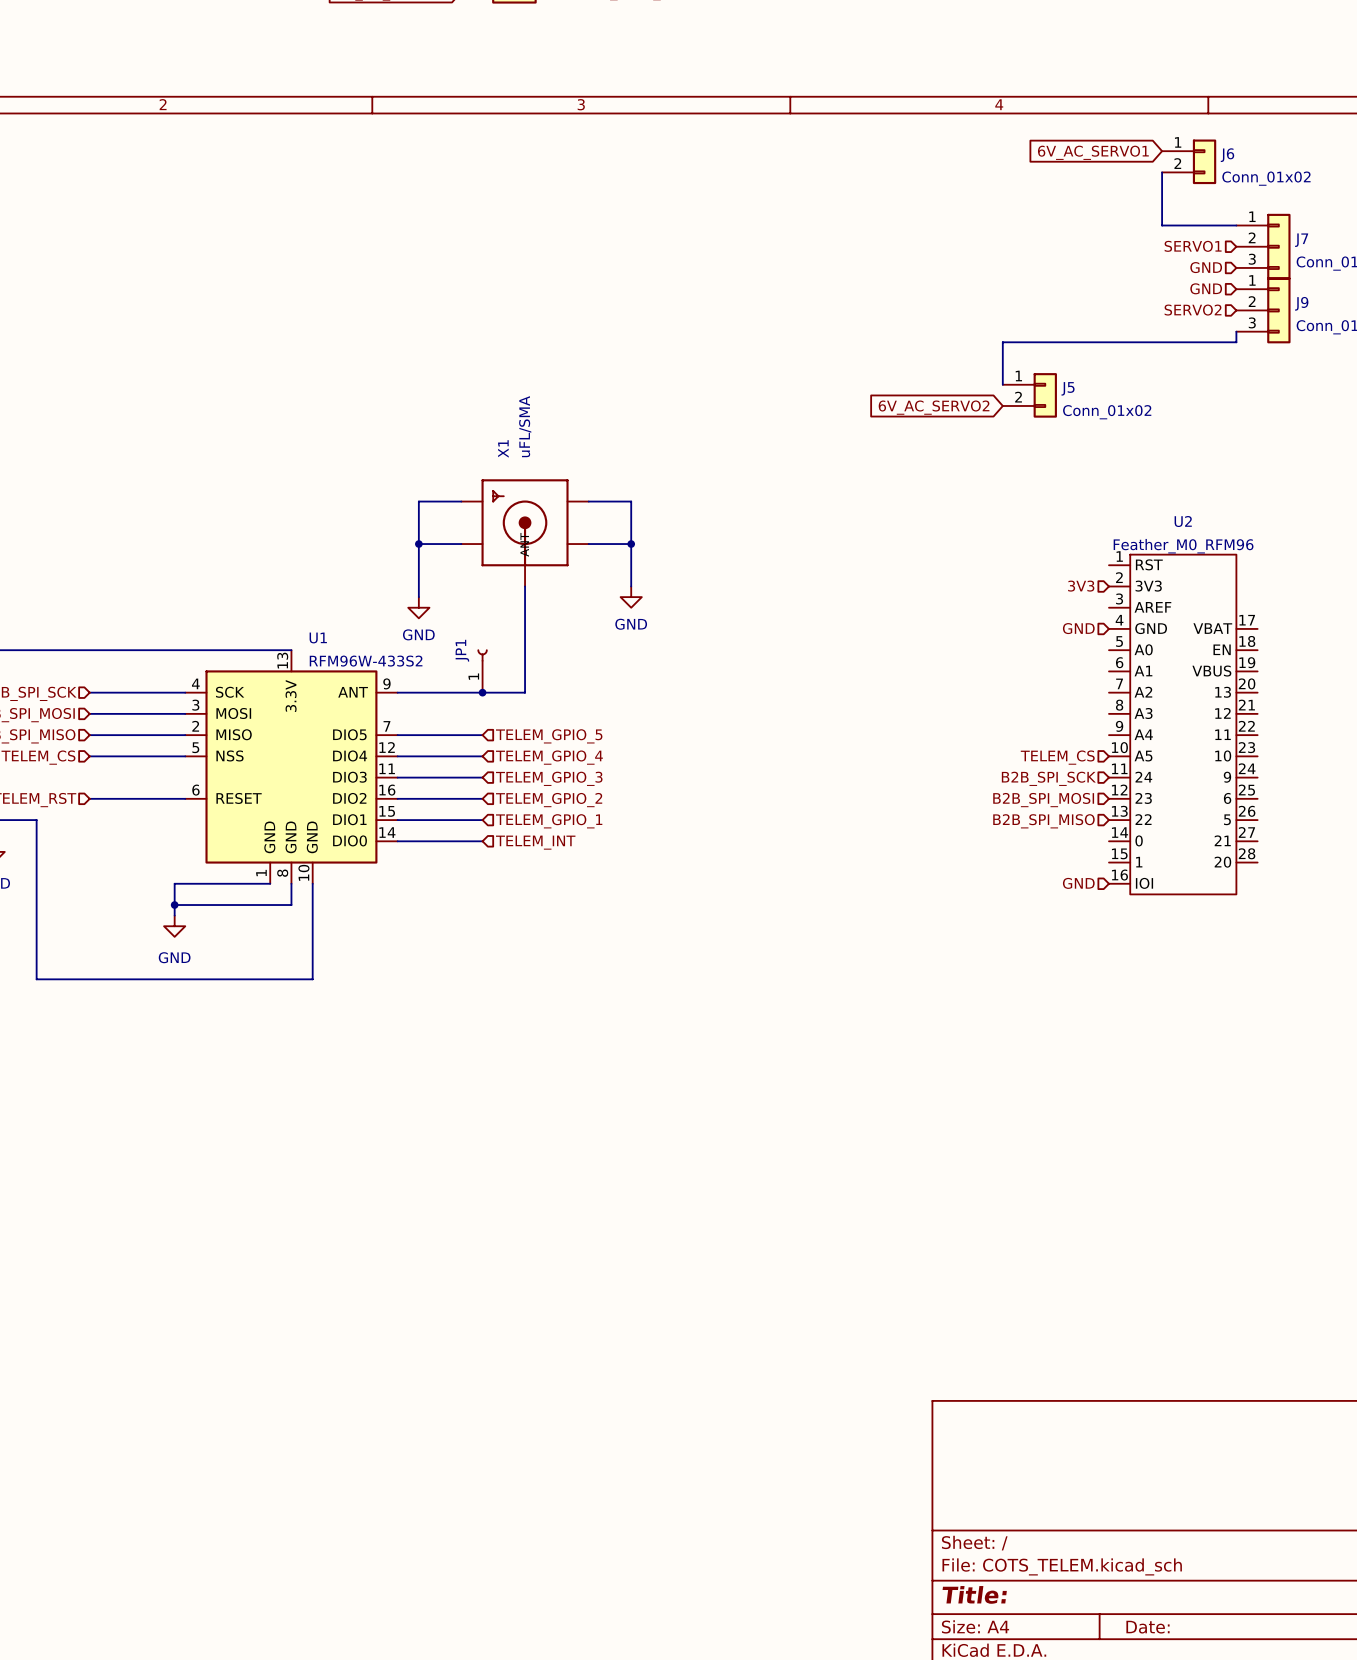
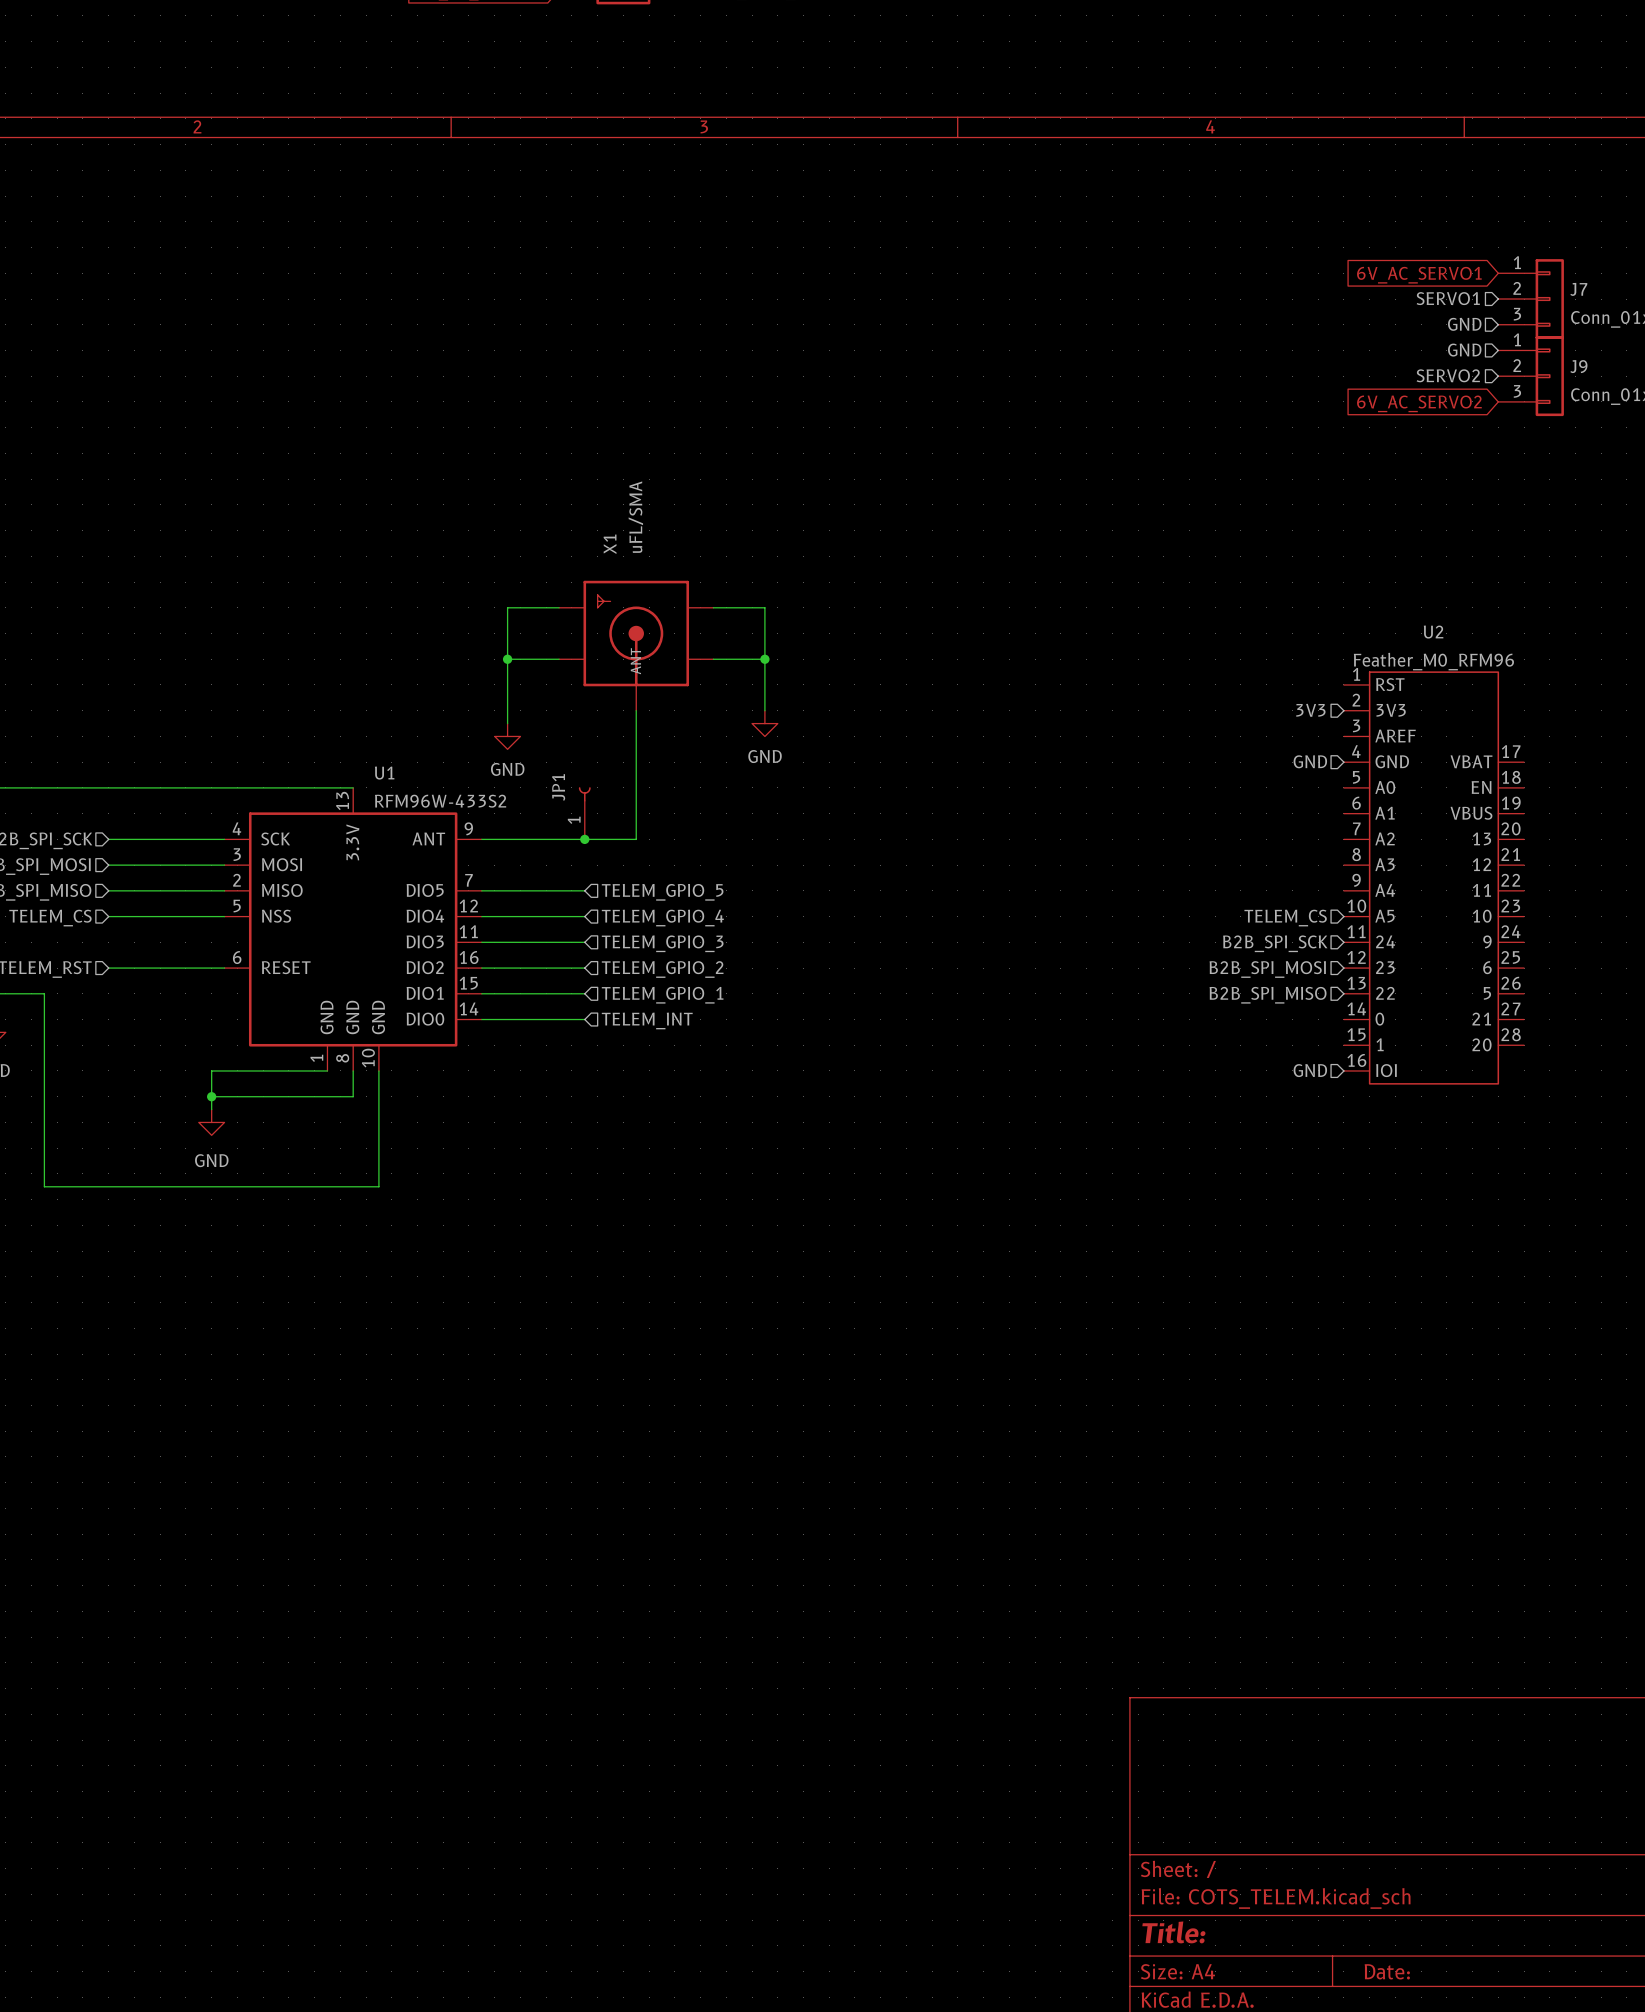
global label position: 6V_AC_SERVO1 (1093, 152) -> 6V_AC_SERVO1 (1419, 275)
J6: Conn_01x02 (1189, 161) -> none
wire: (1162, 172) (1162, 225) (1236, 225) -> none
wire: (1236, 331) (1236, 342) (1002, 342) (1002, 384) -> none
global label: none -> 6V_AC_SERVO2 (1419, 403)
J5: Conn_01x02 (1029, 395) -> none
global label: 6V_AC_SERVO2 (934, 407) -> none

